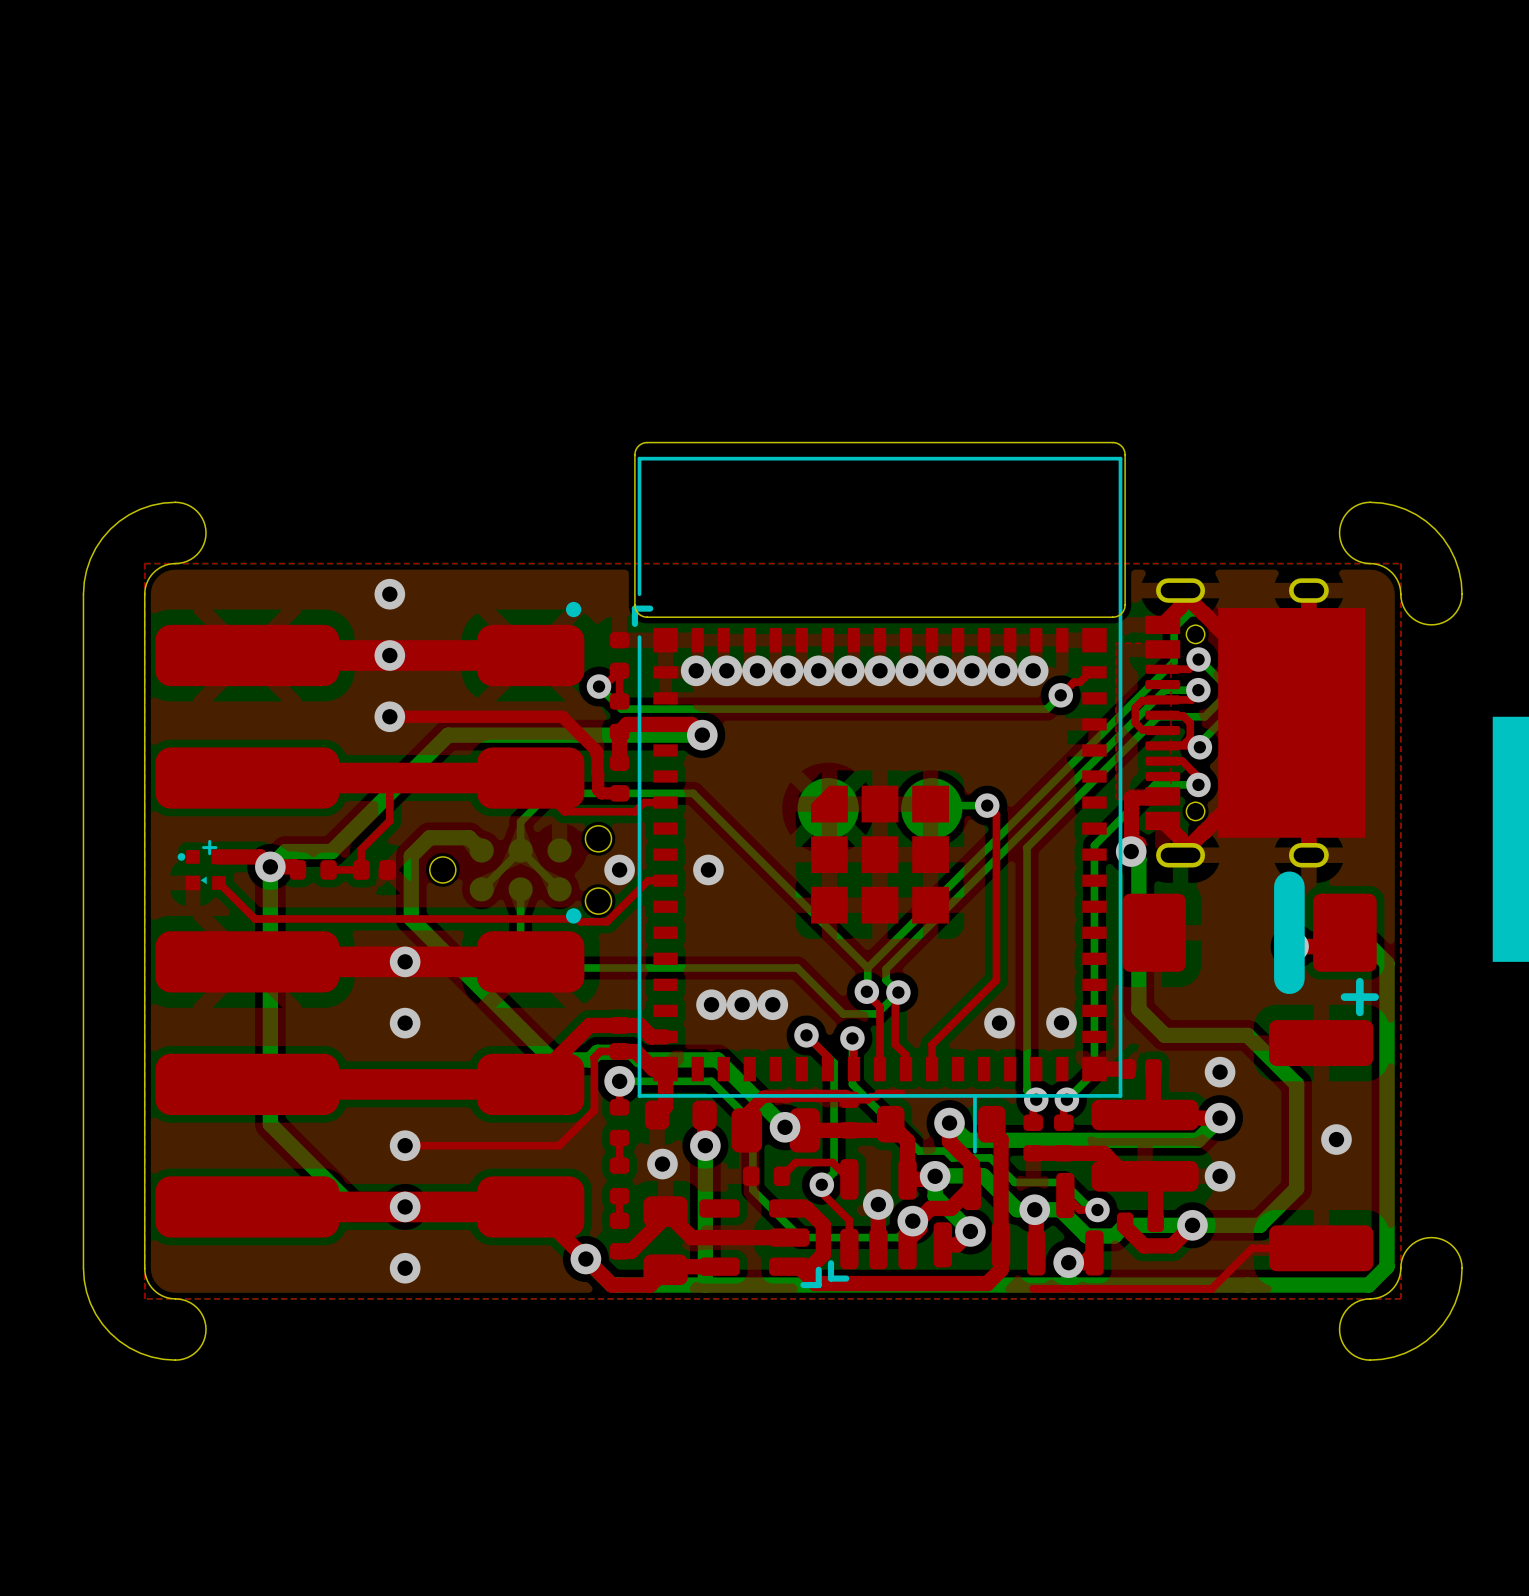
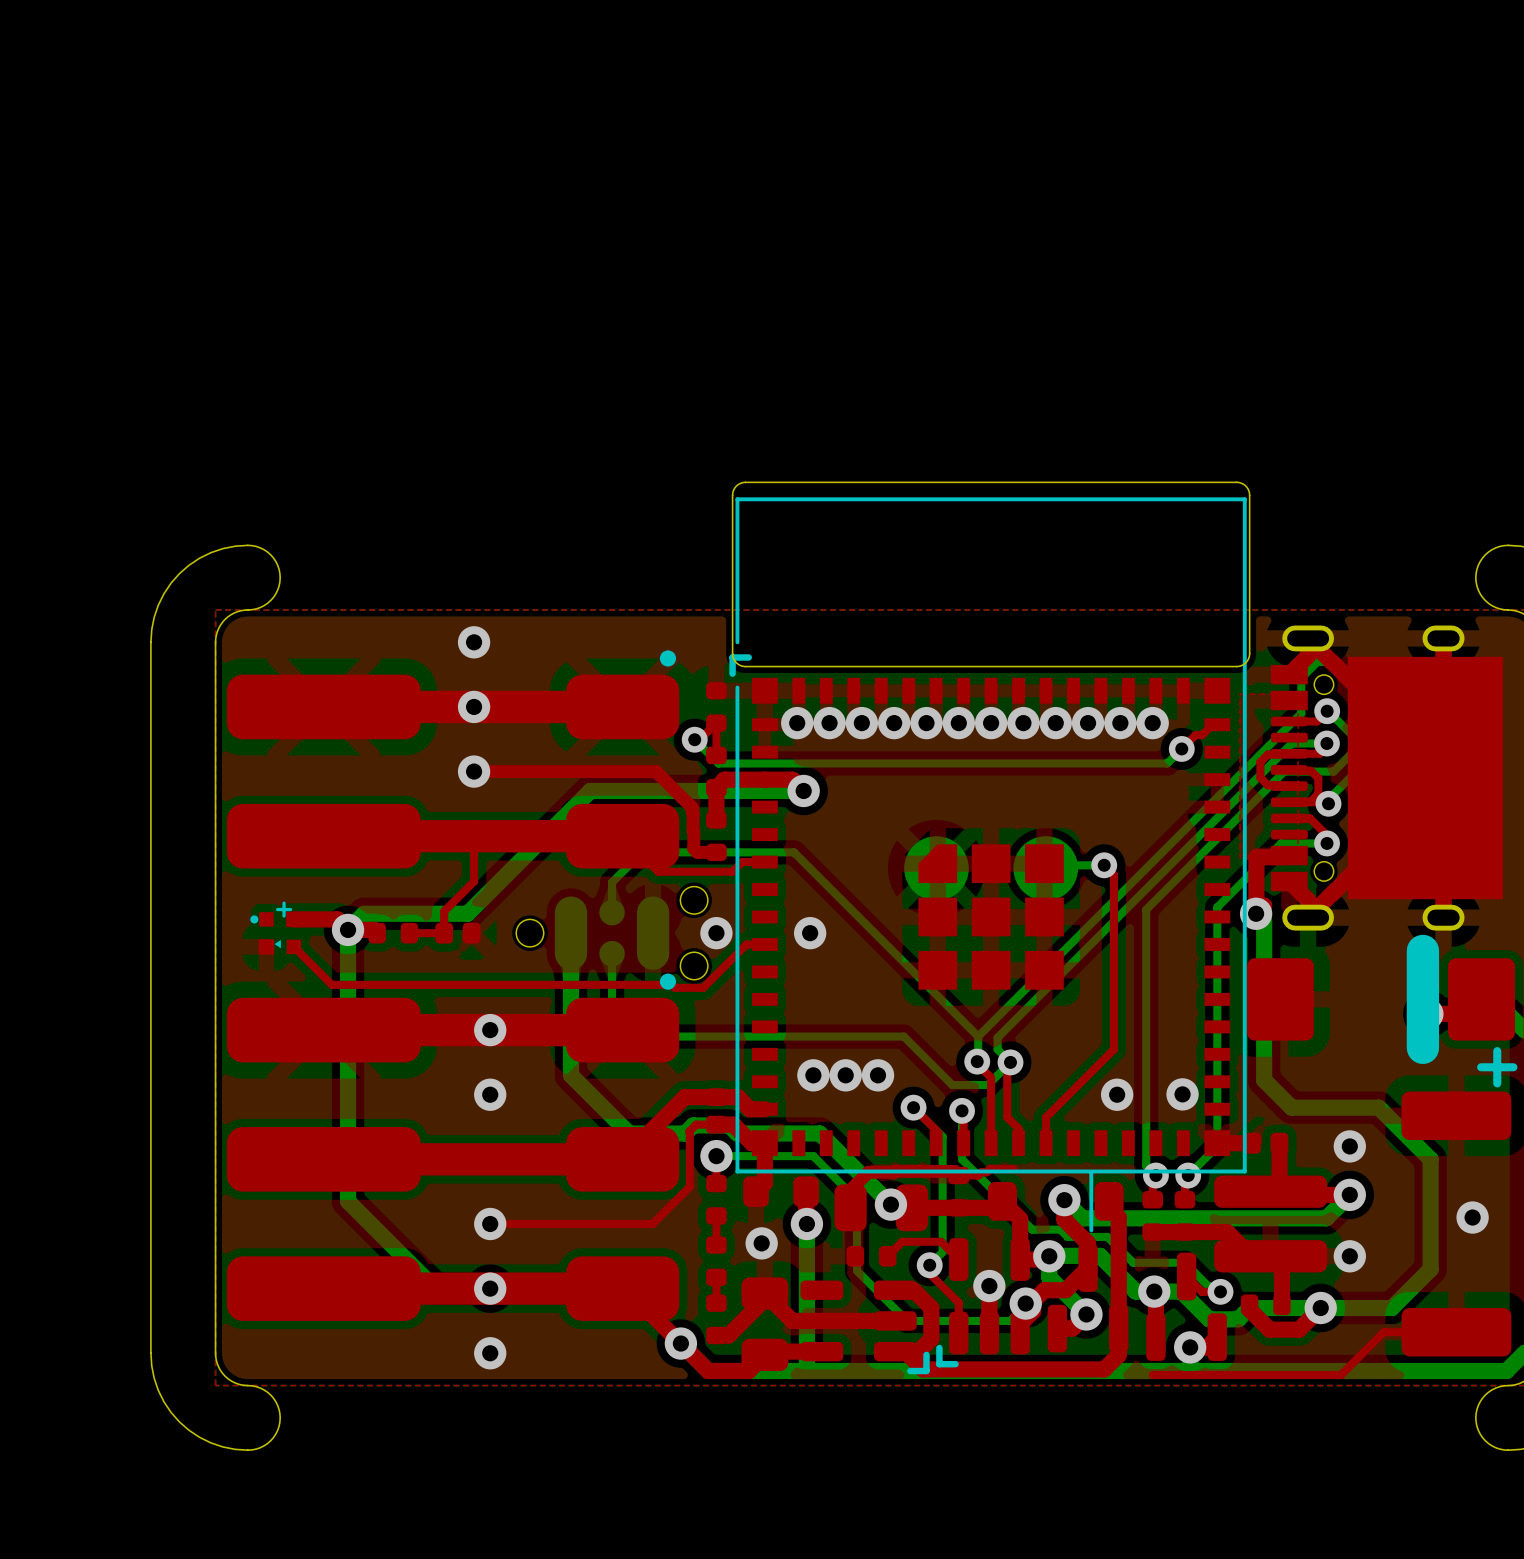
bottom track: (500, 735) (448, 735) (331, 851) -> (590, 790) (467, 913) (412, 913)
bottom track: (481, 850) (469, 837) (429, 837) (411, 856) (411, 918) (552, 1059) -> (571, 912) (571, 1075) (629, 1133) (645, 1133)
bottom track: (481, 889) (520, 850) (559, 889) -> (653, 912) (653, 953)

